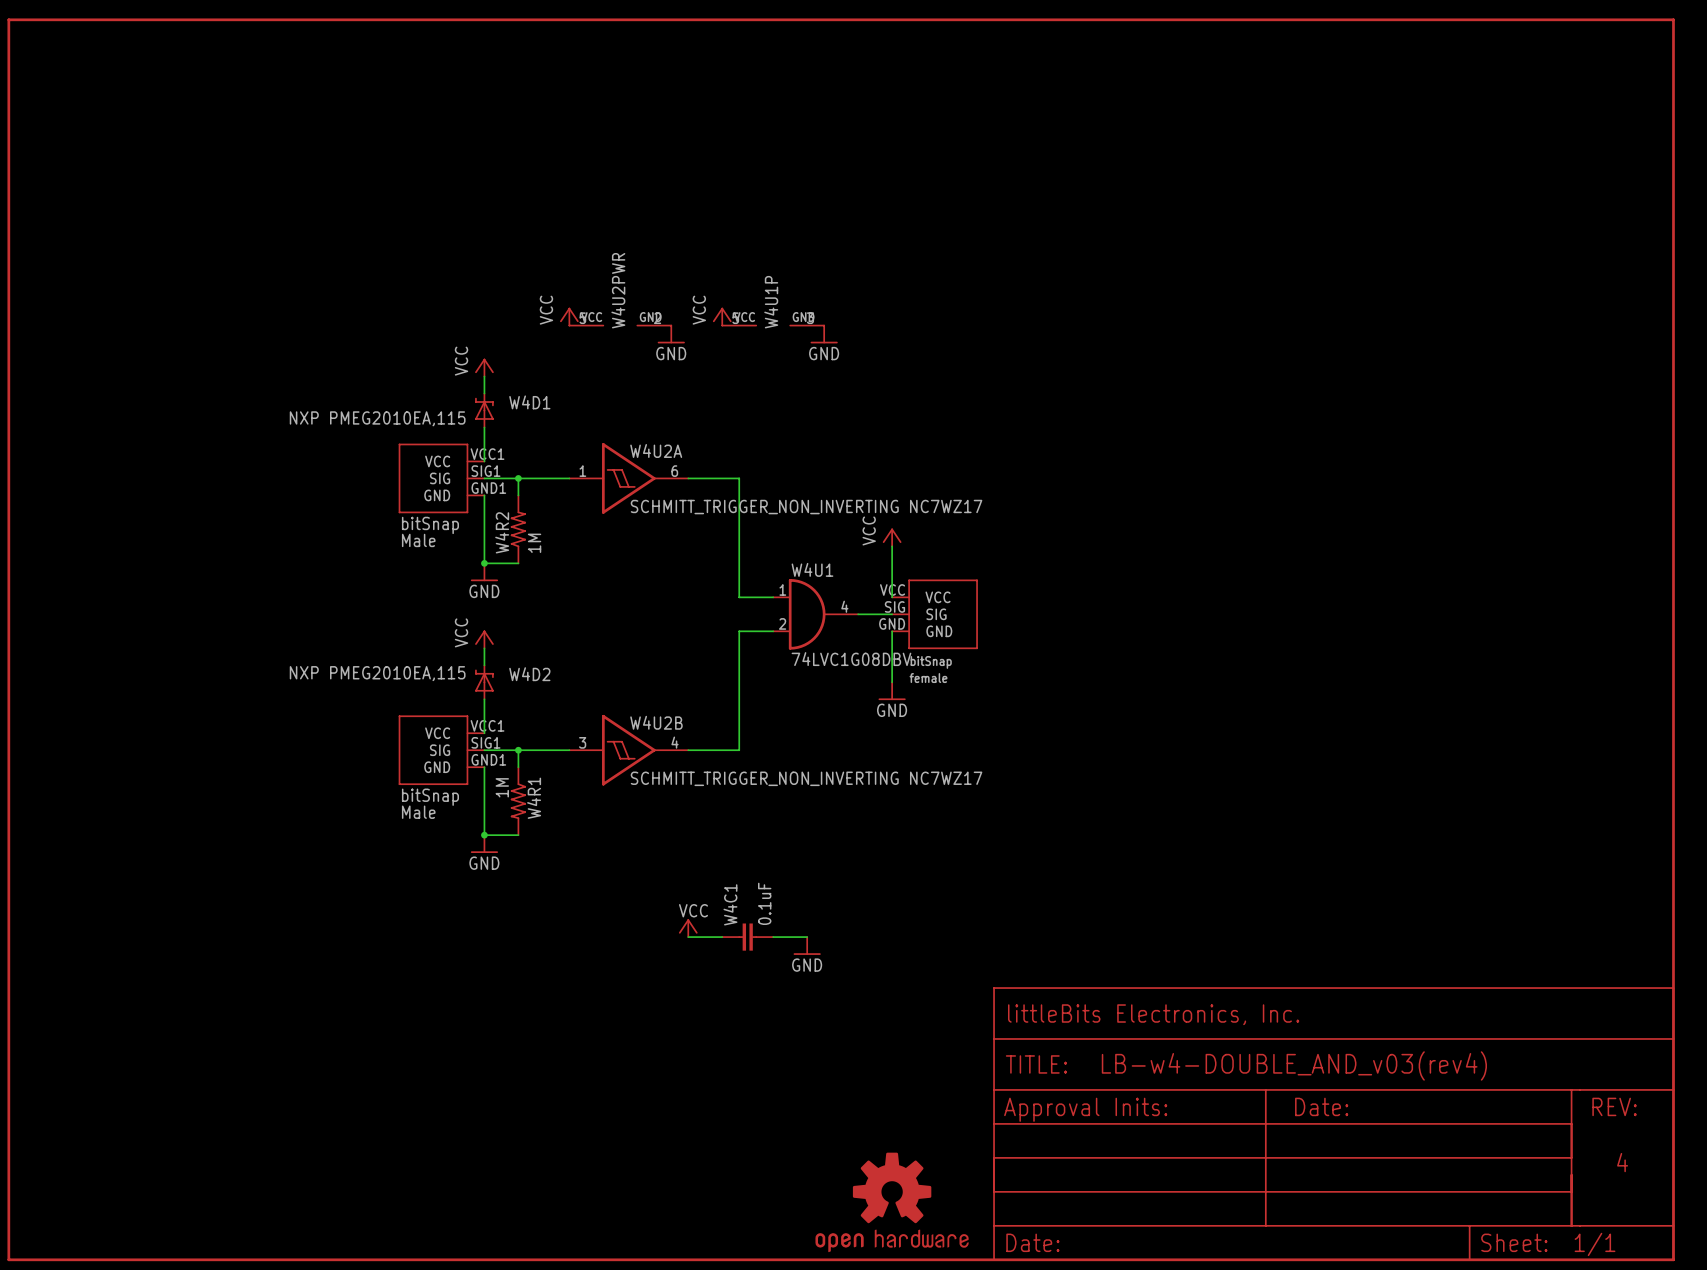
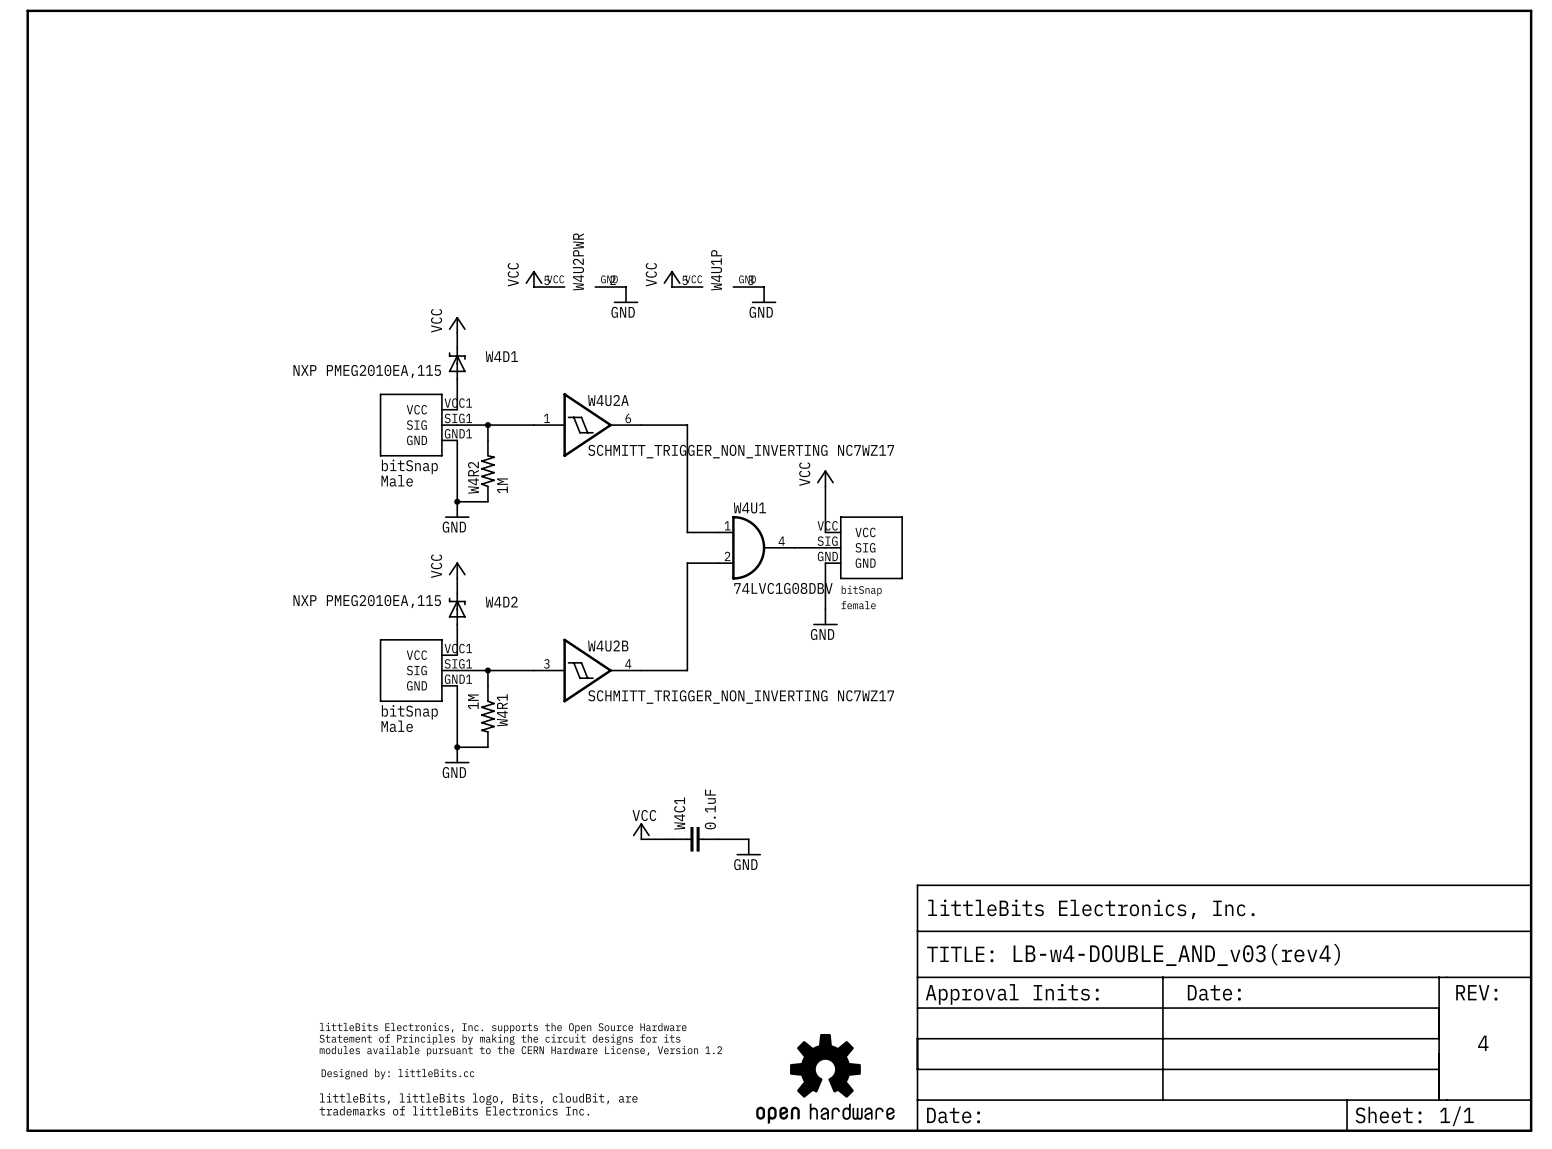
part: none -> (520, 1069)

